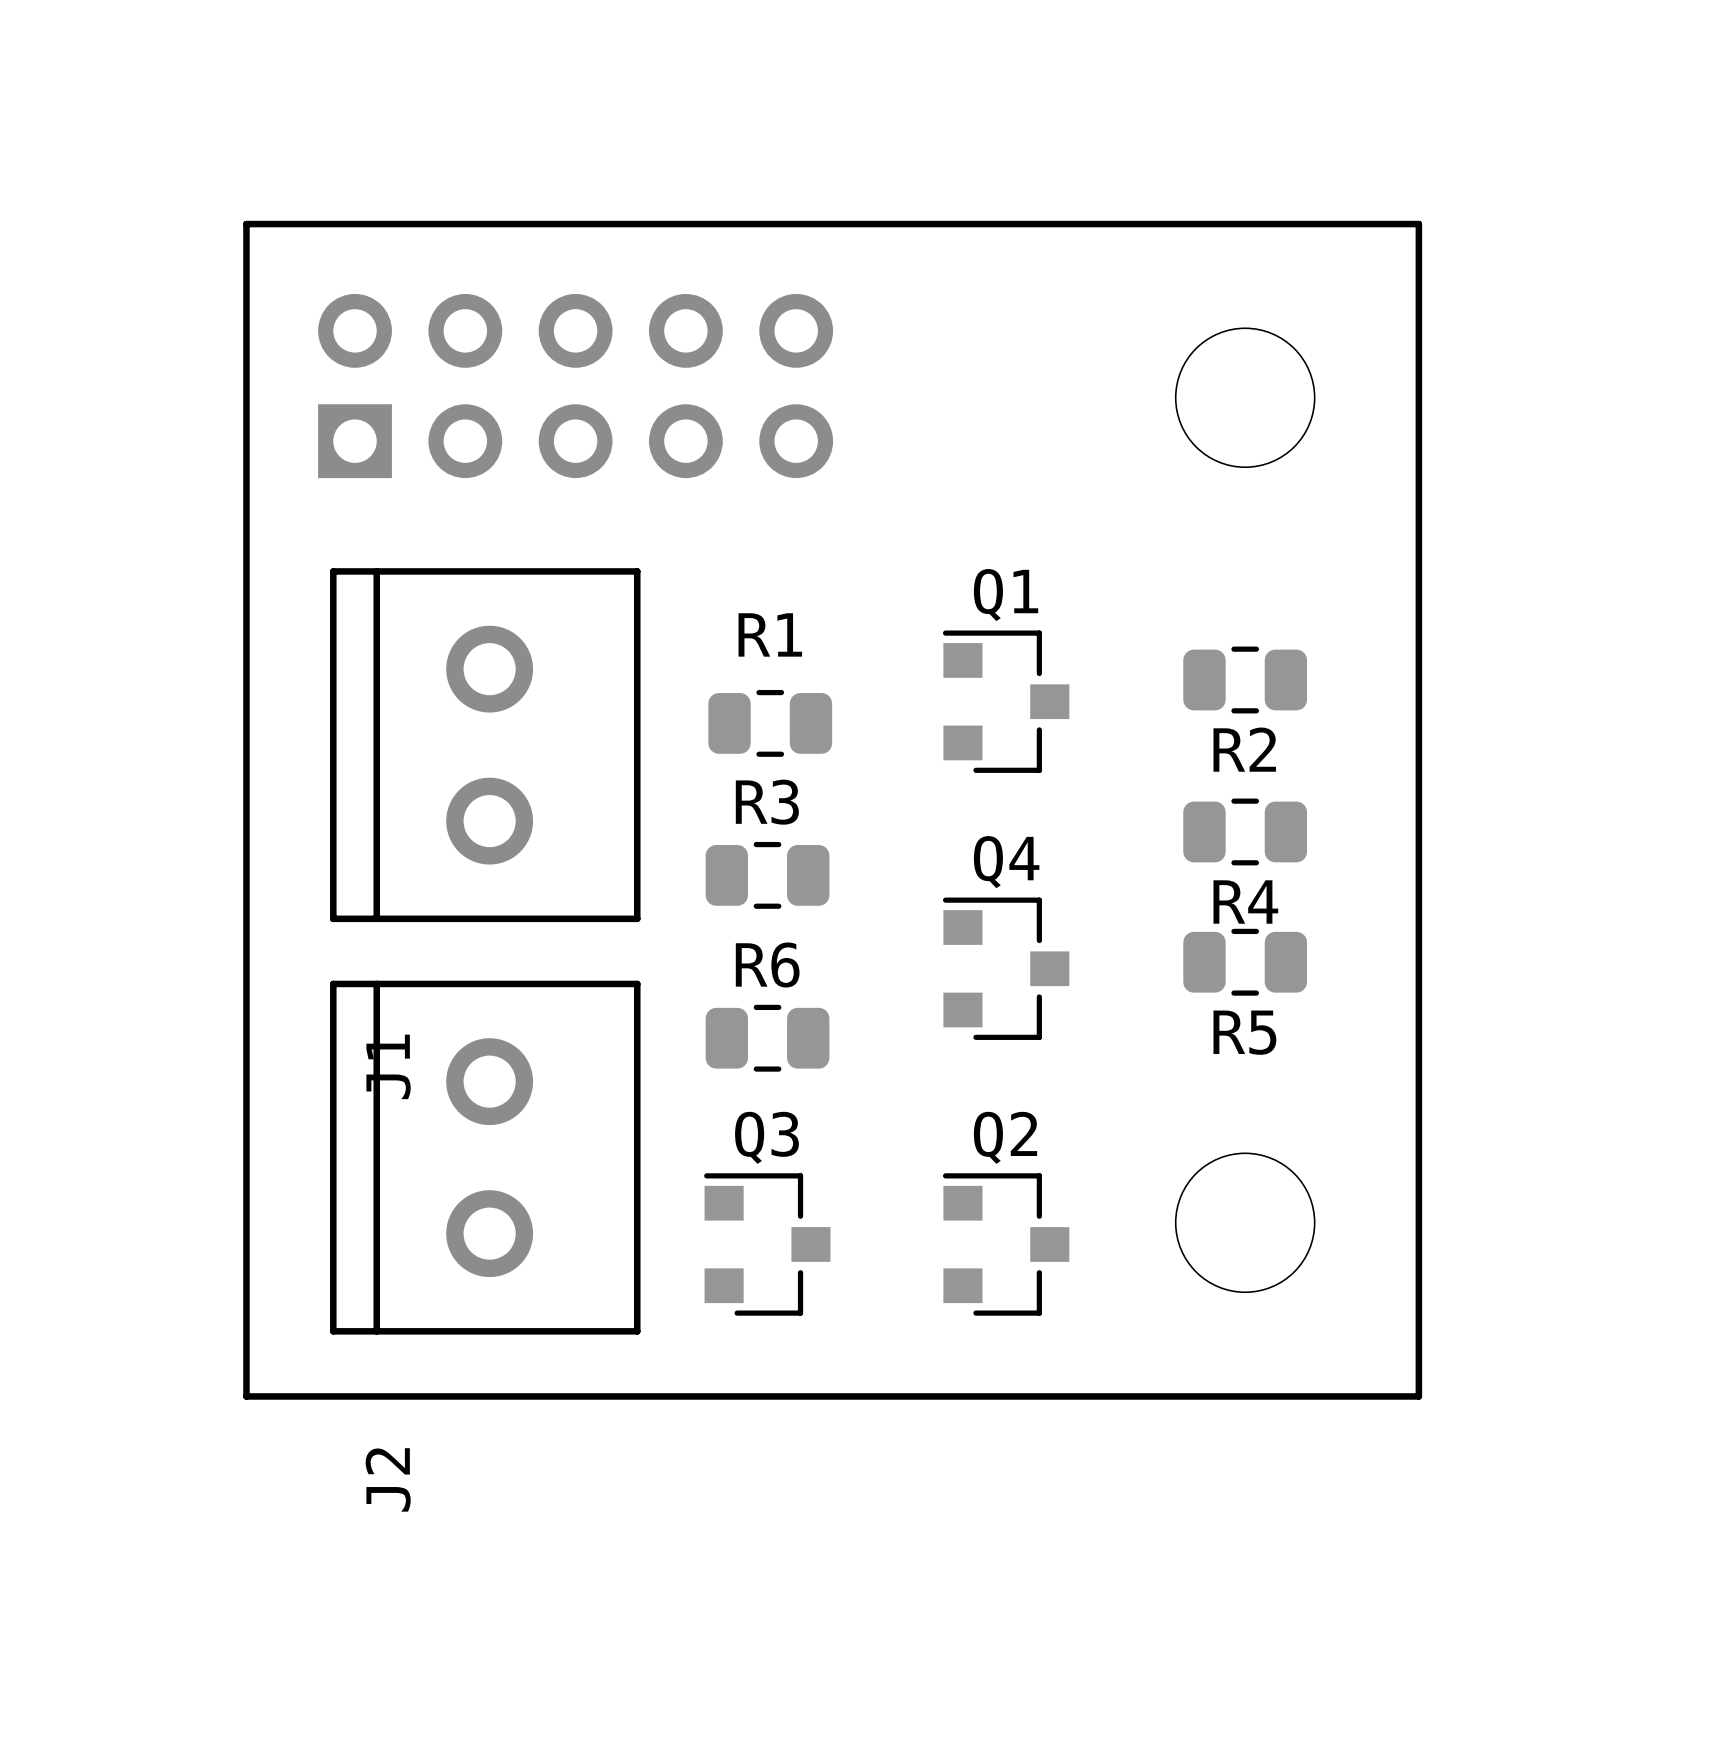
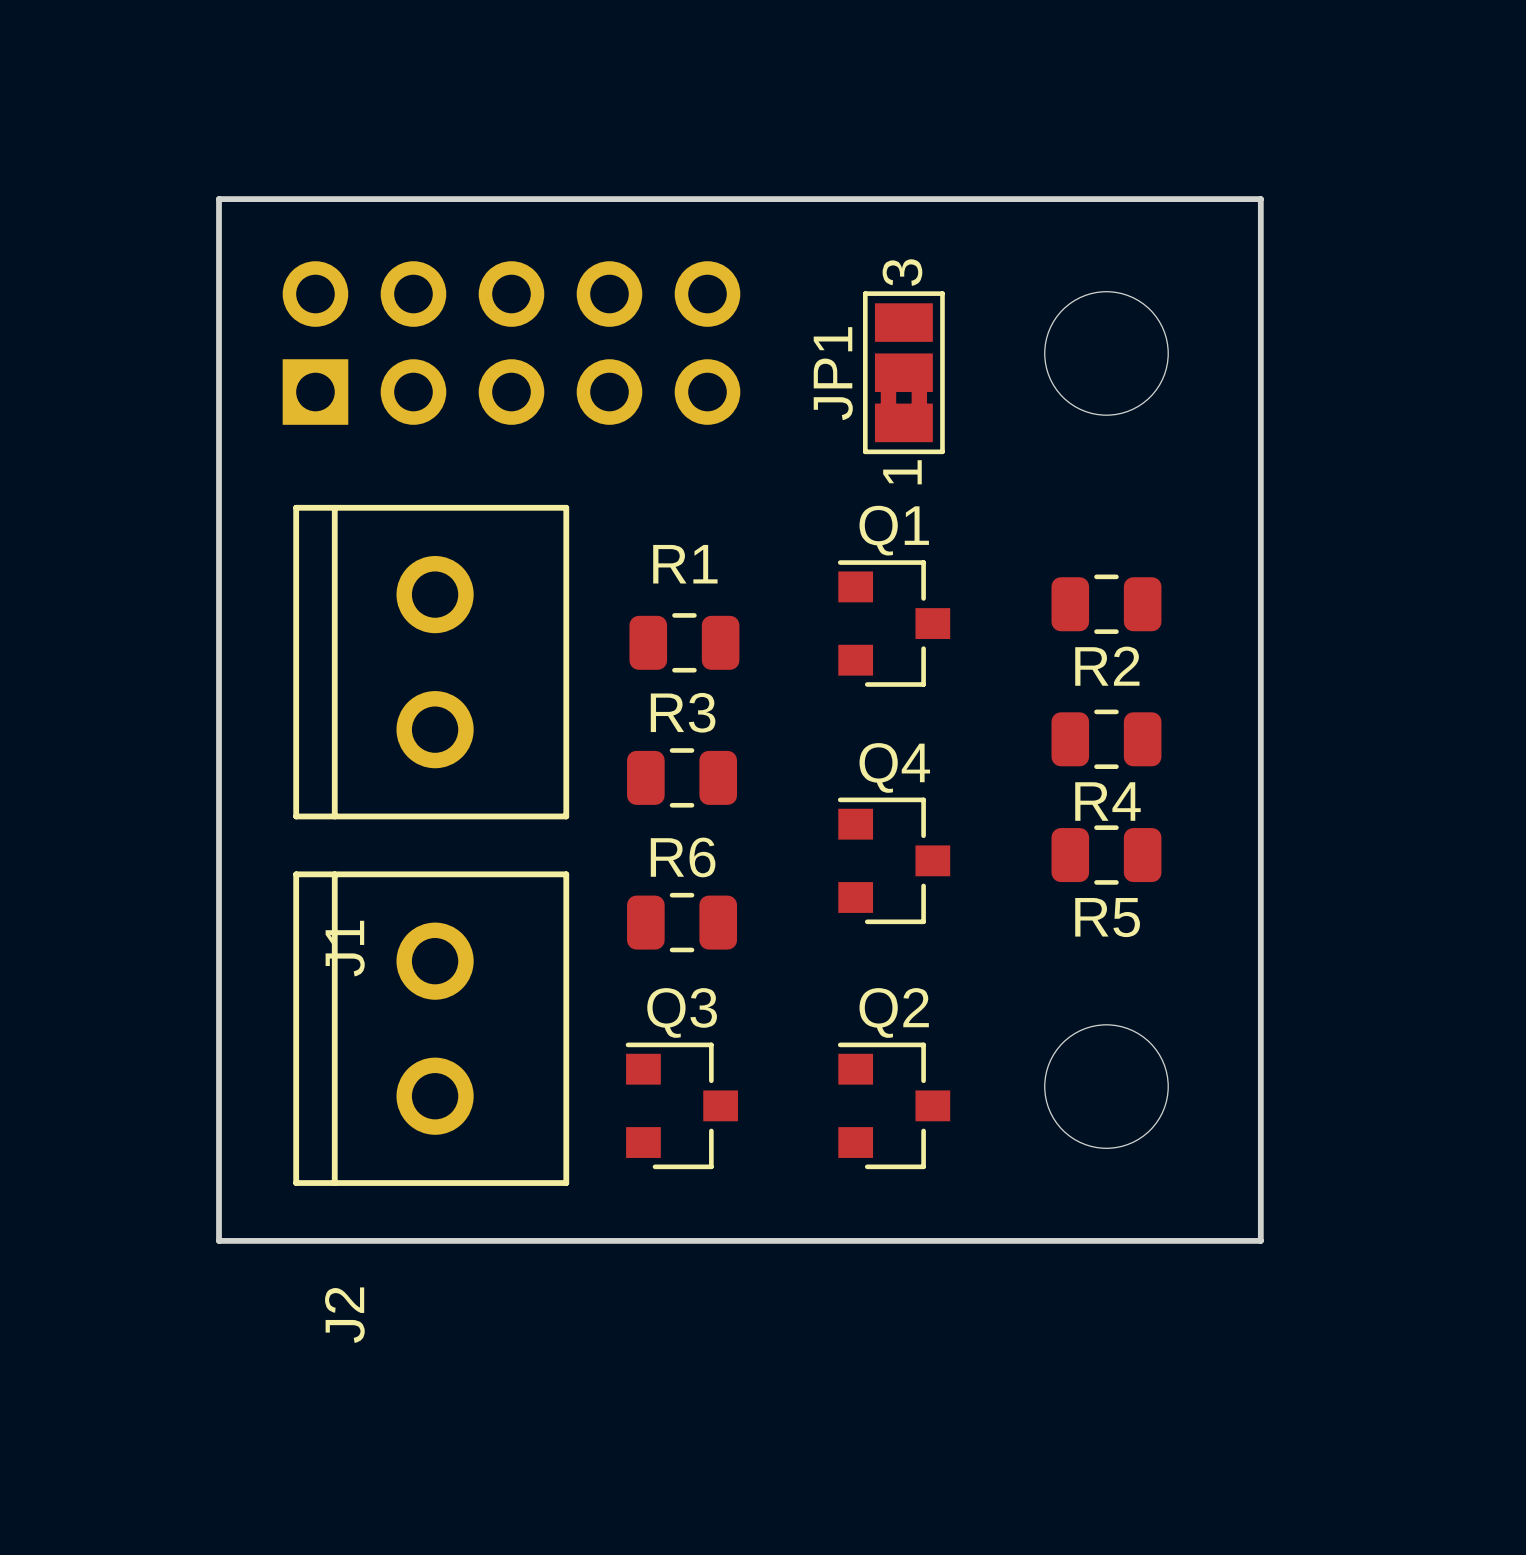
JP1: none -> (903, 372)

